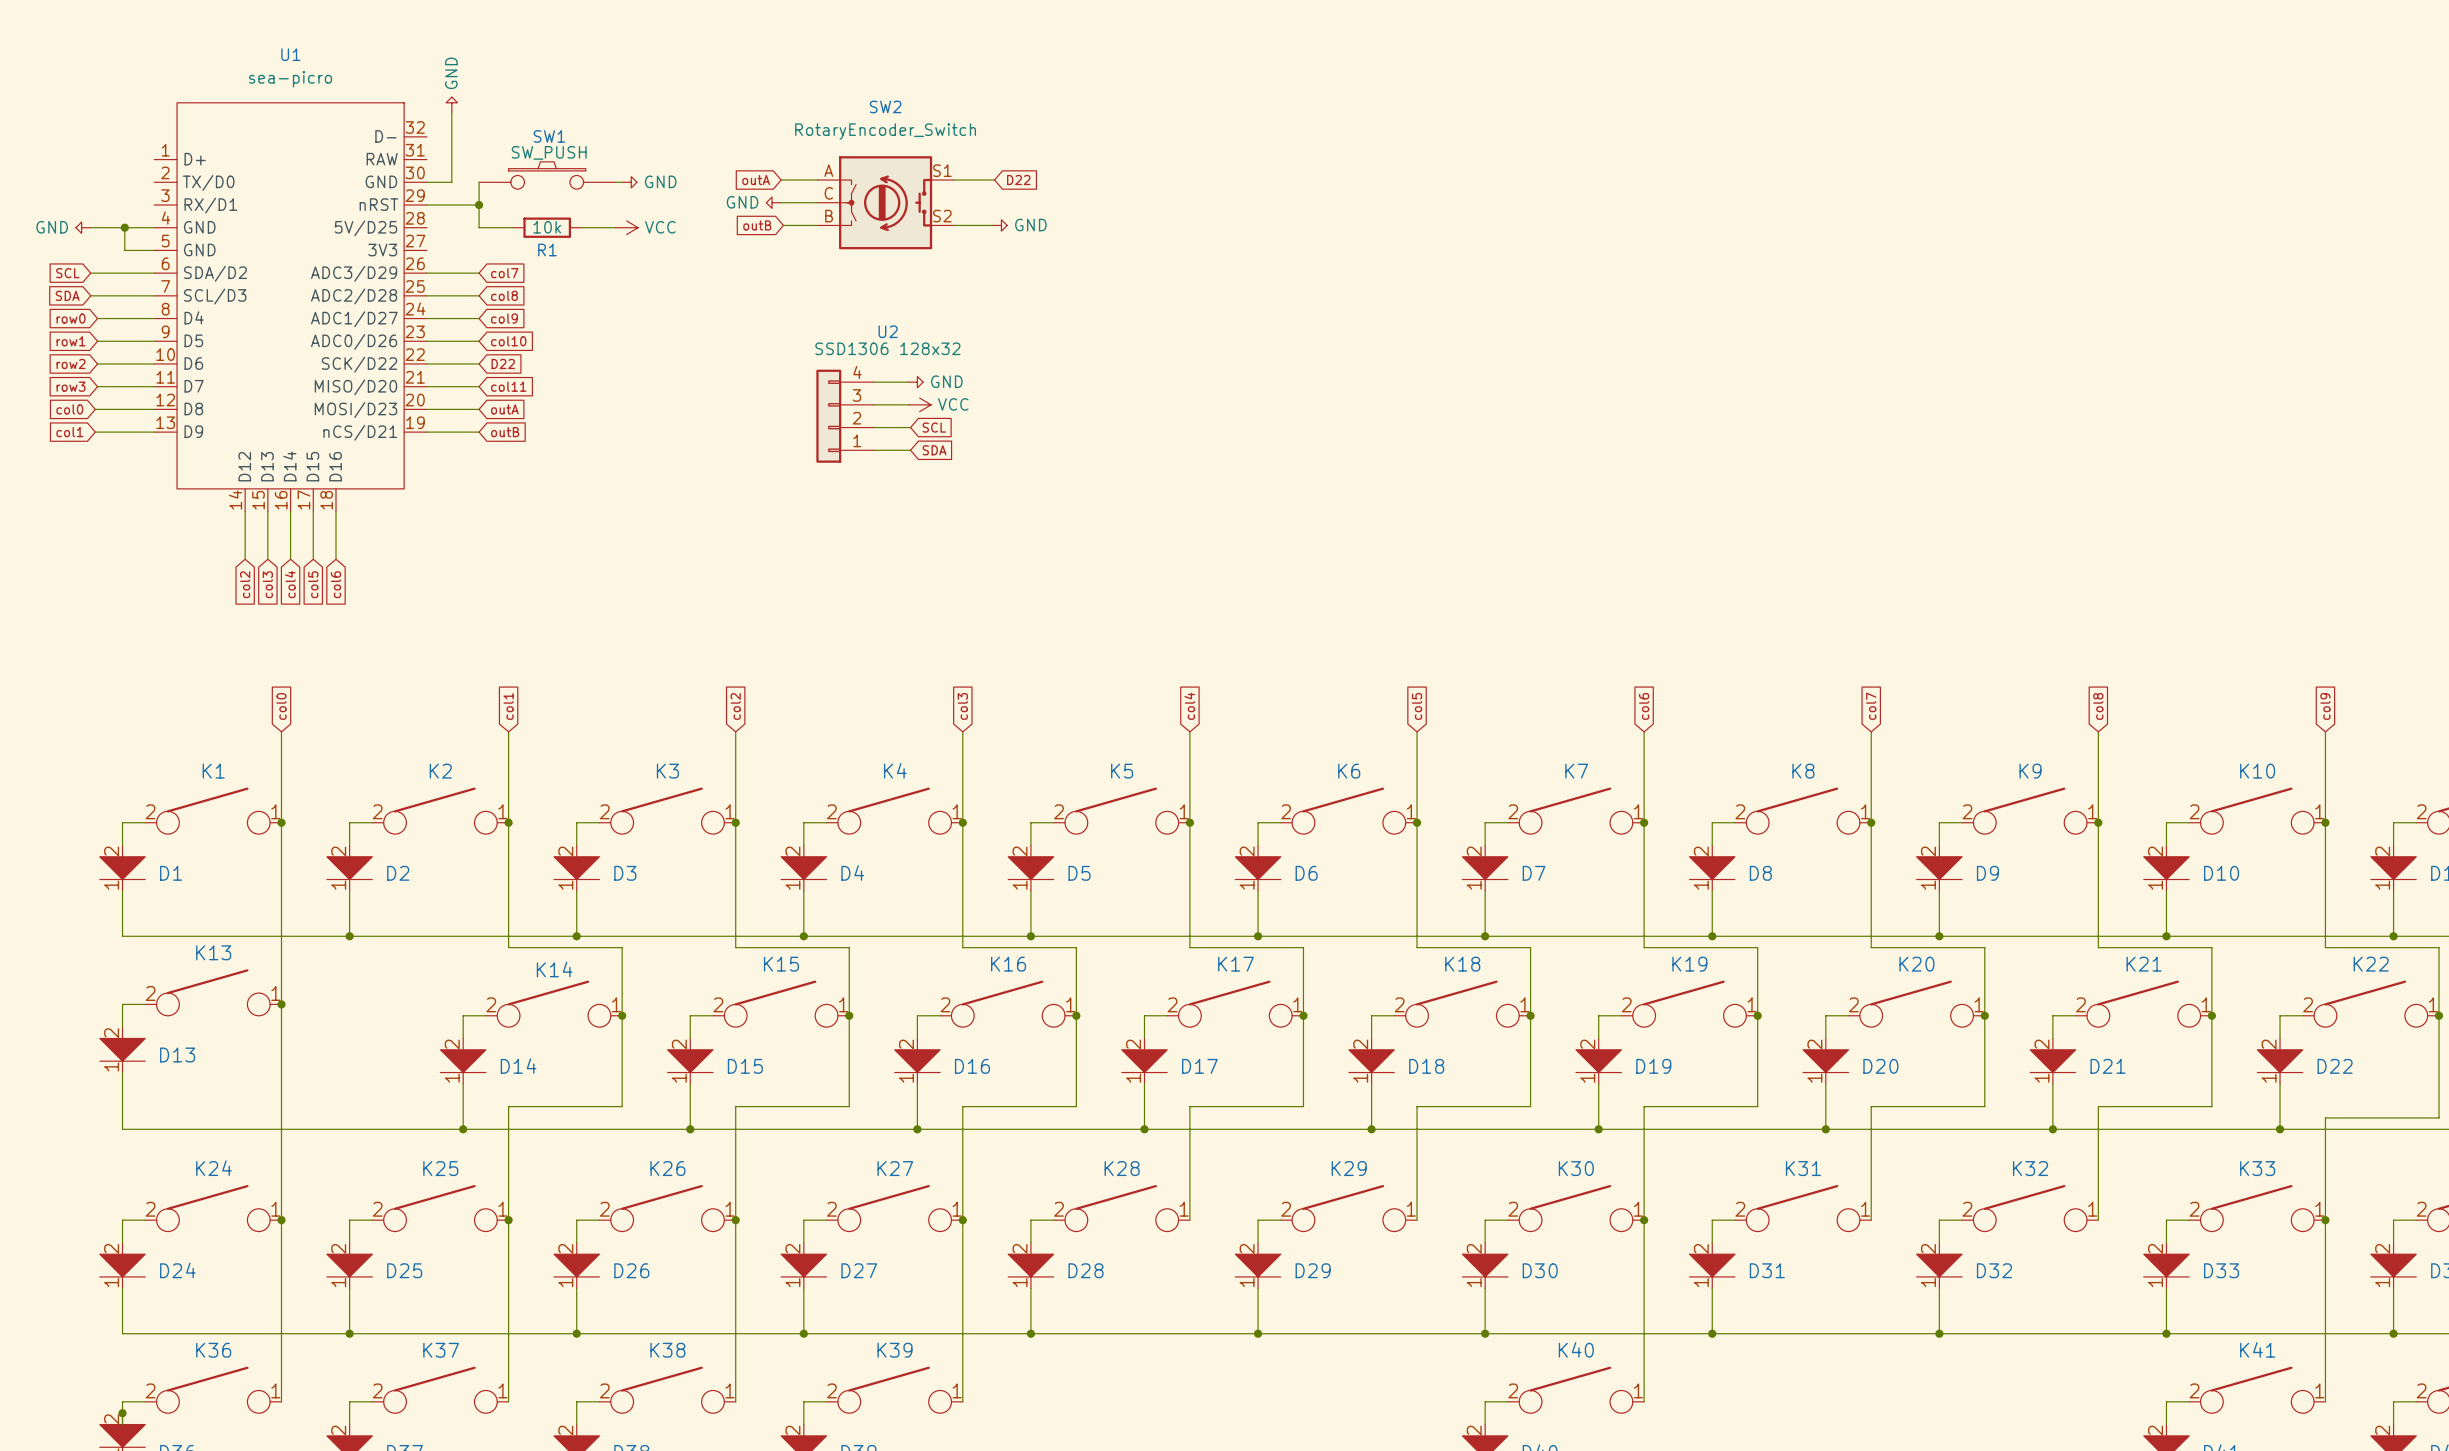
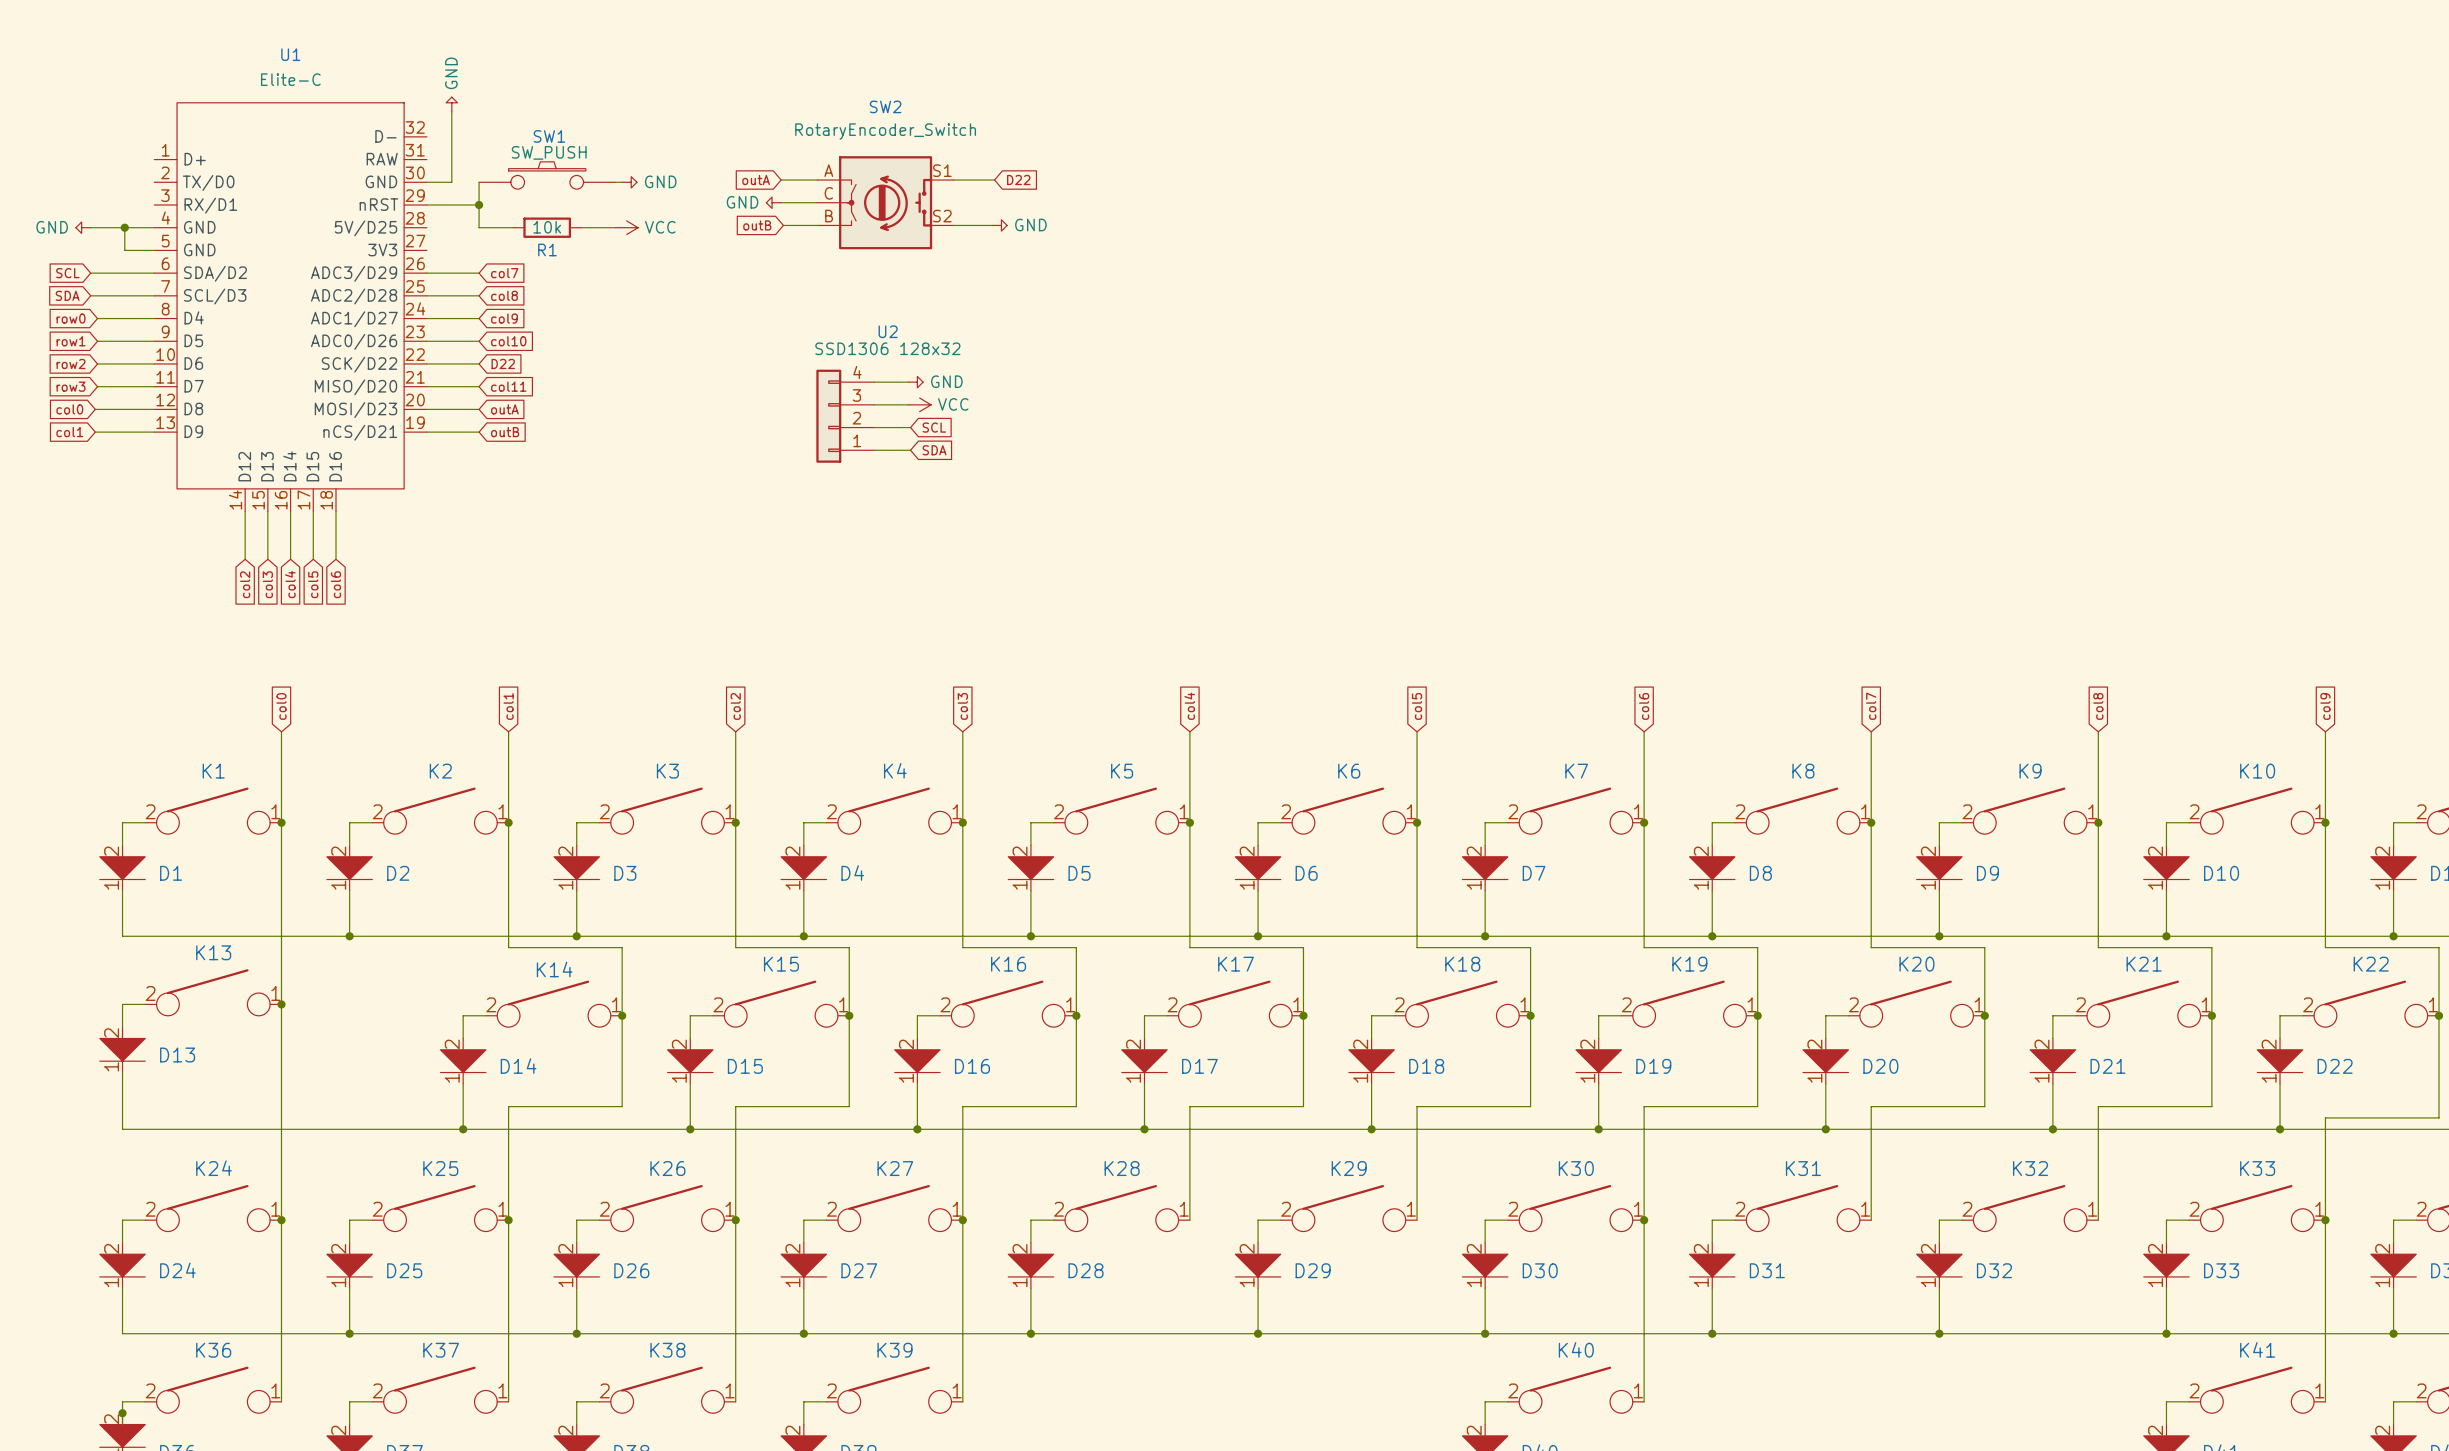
U1 value: sea-picro (290, 79) -> Elite-C (290, 79)

